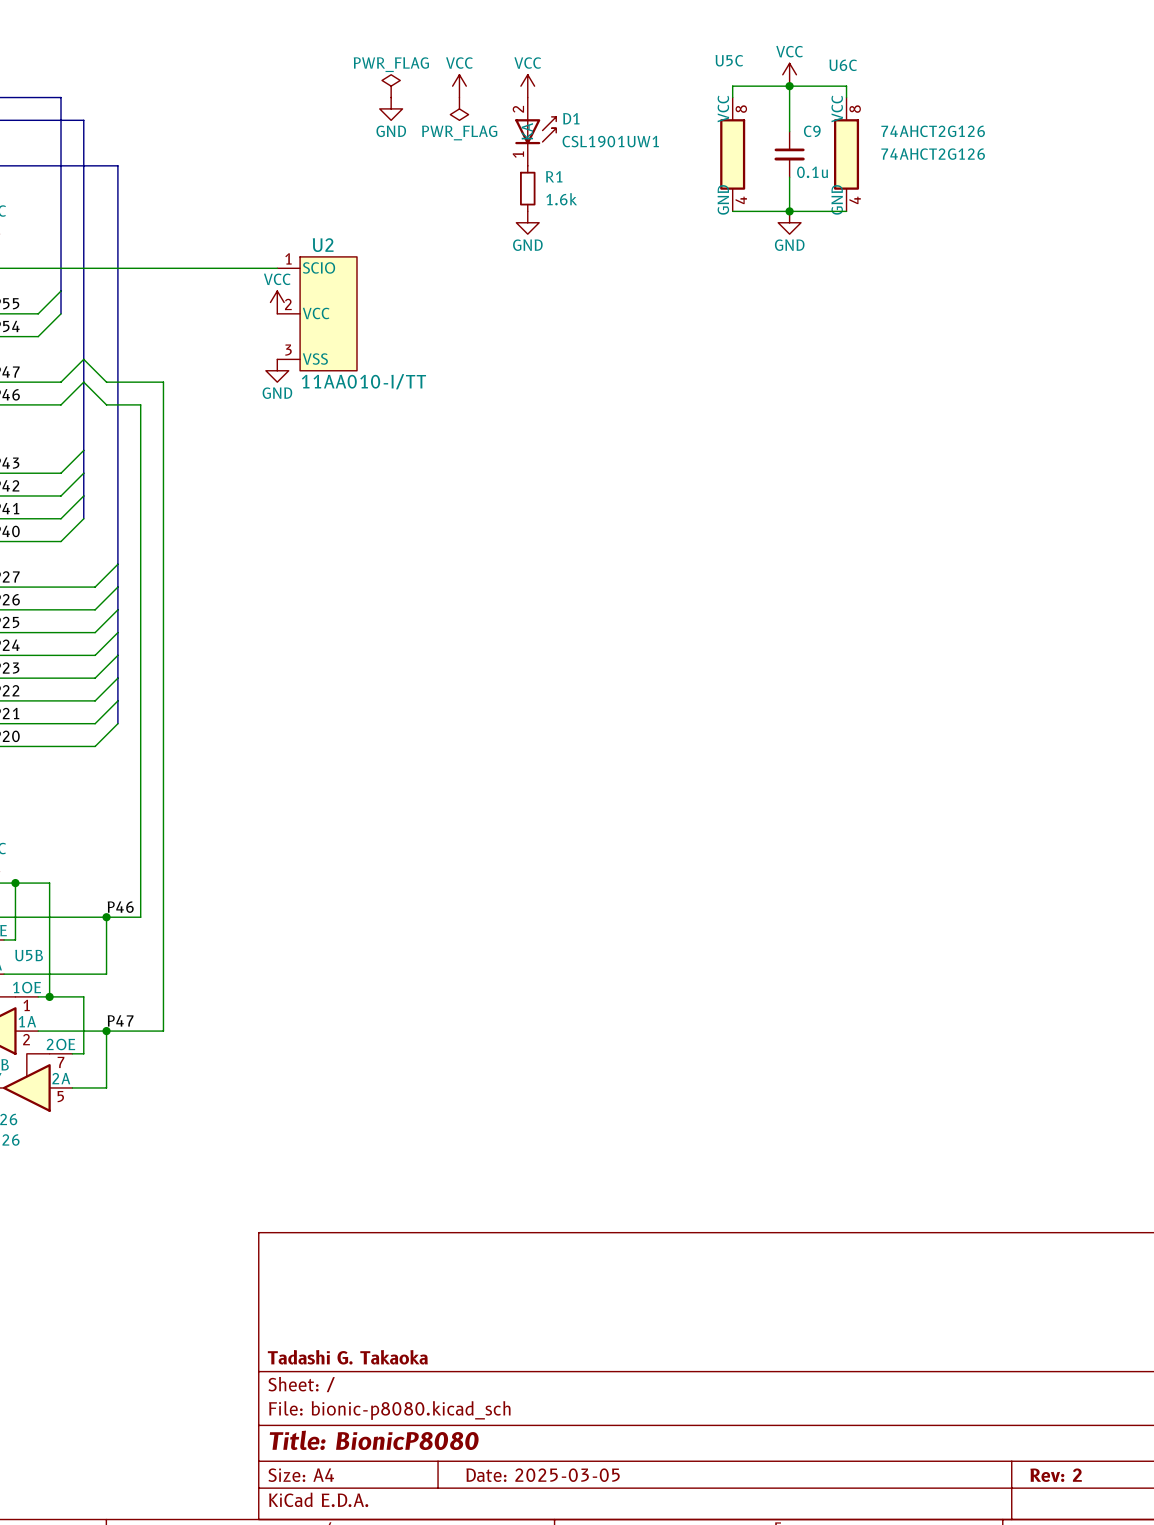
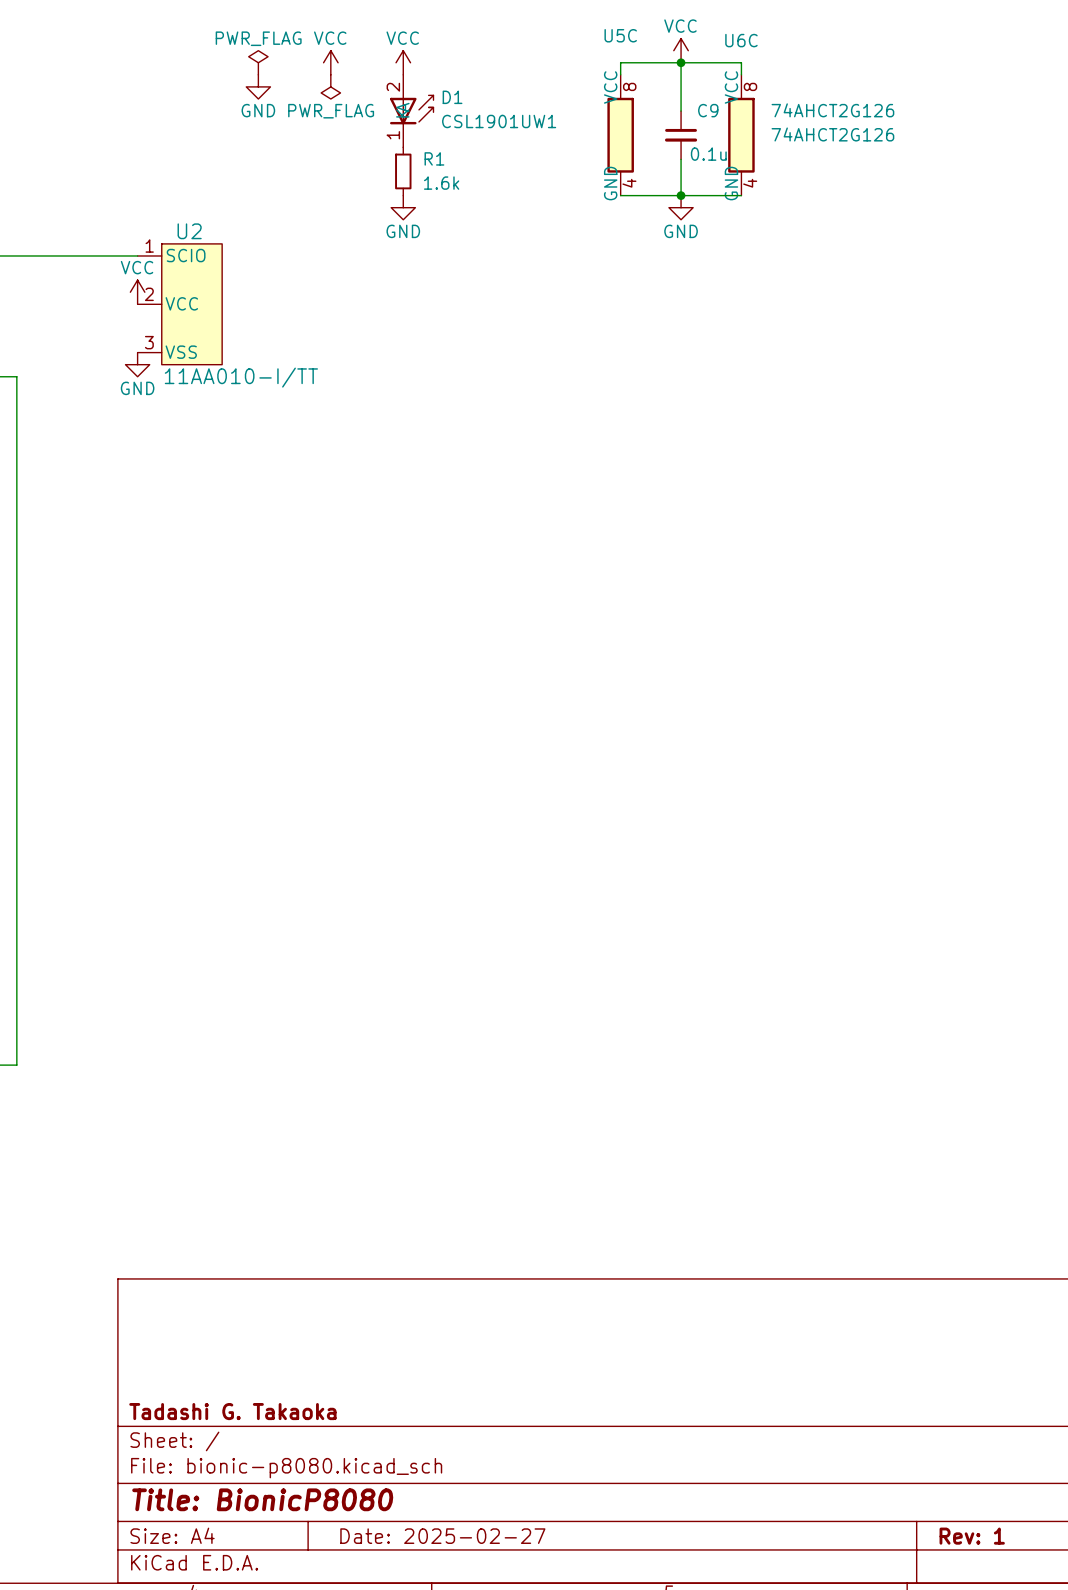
title block: Date: 2025-03-05 (543, 1475) -> Date: 2025-02-27 (442, 1536)
title block: Rev: 2 (1056, 1475) -> Rev: 1 (972, 1536)

